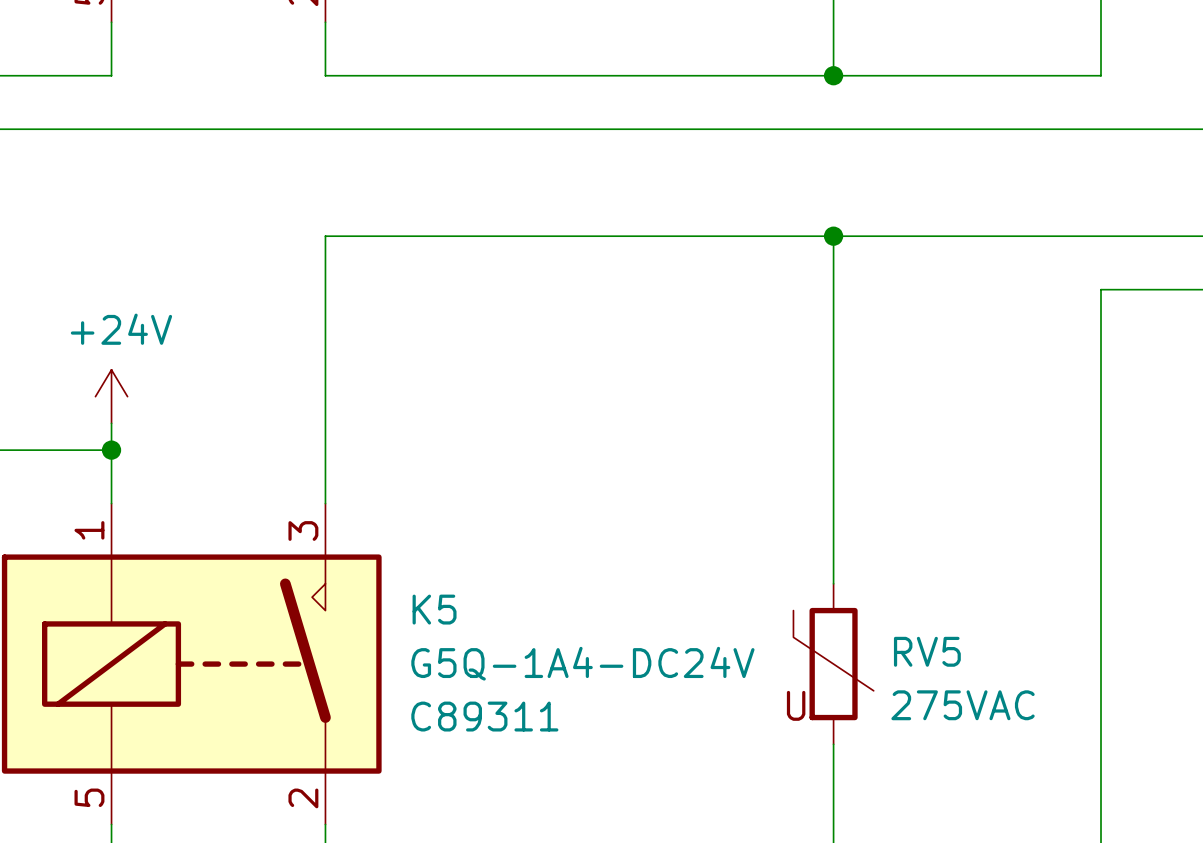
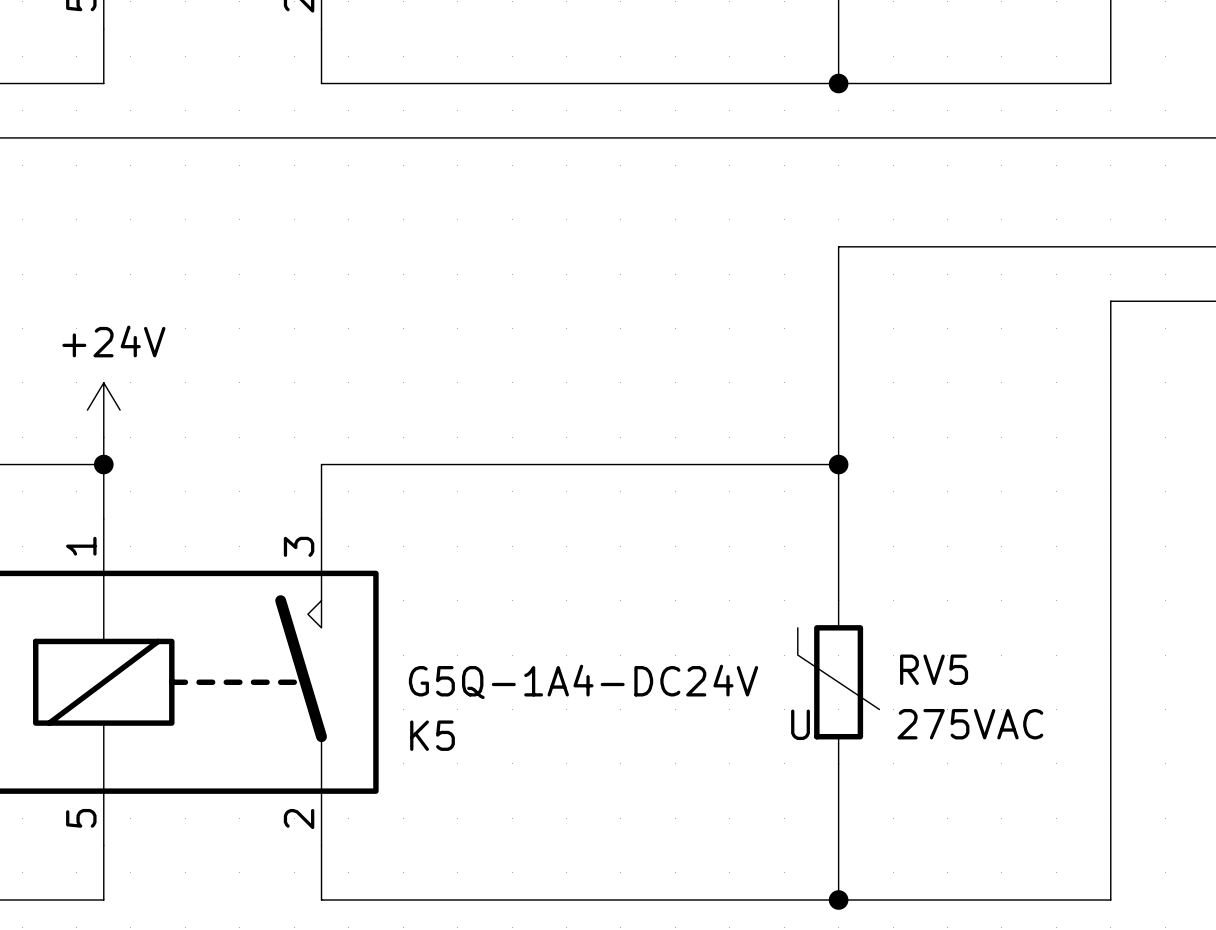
wire: (833, 236) (325, 236) (325, 450) -> (838, 464) (321, 464)
junction: (833, 236) -> none
junction: none -> (838, 464)
K5 name position: K5 (434, 609) -> K5 (432, 735)
K5 text: C89311 (484, 716) -> none

